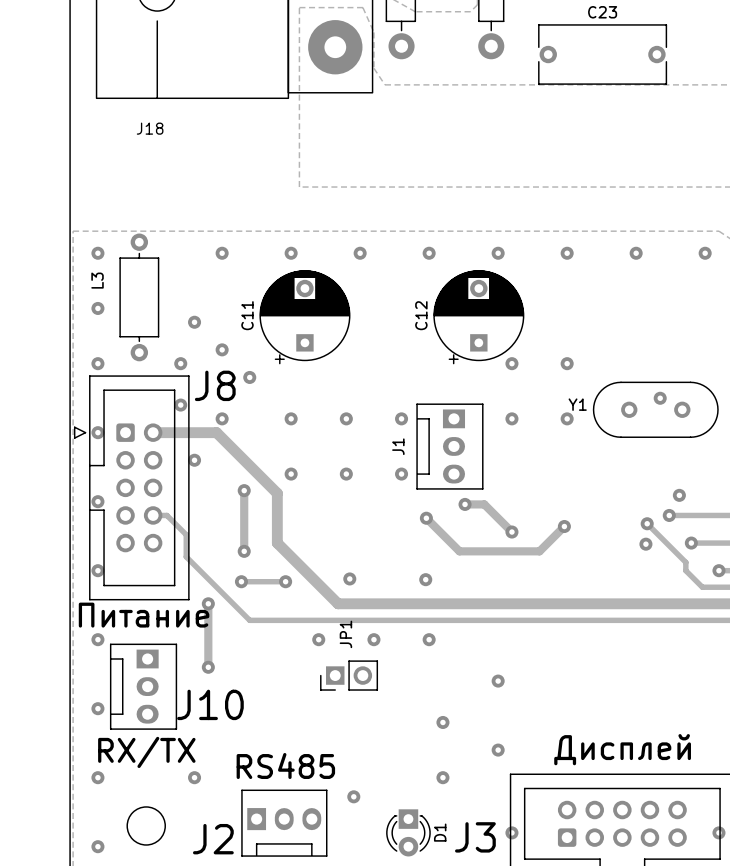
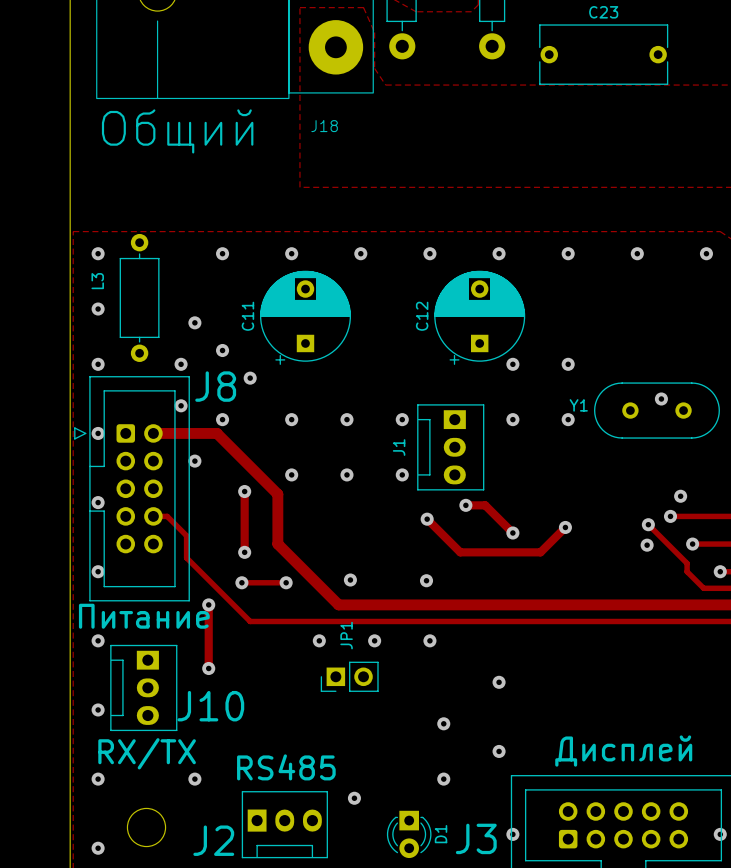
J18 name position: J18 (150, 128) -> J18 (324, 126)
text: none -> Общий (177, 131)

